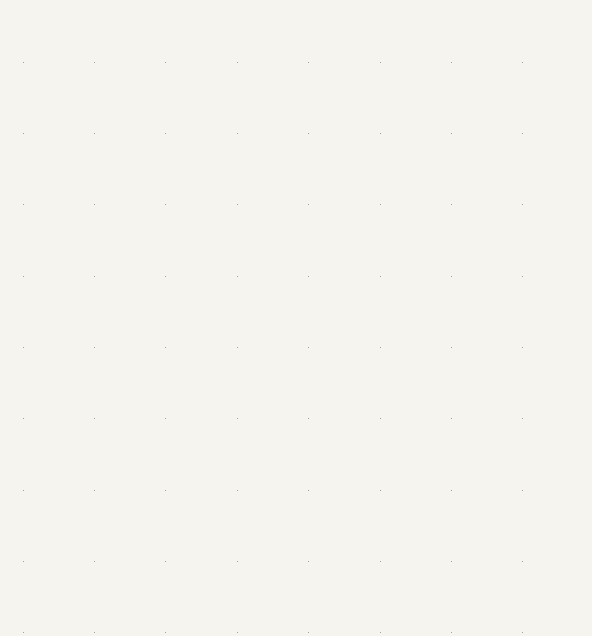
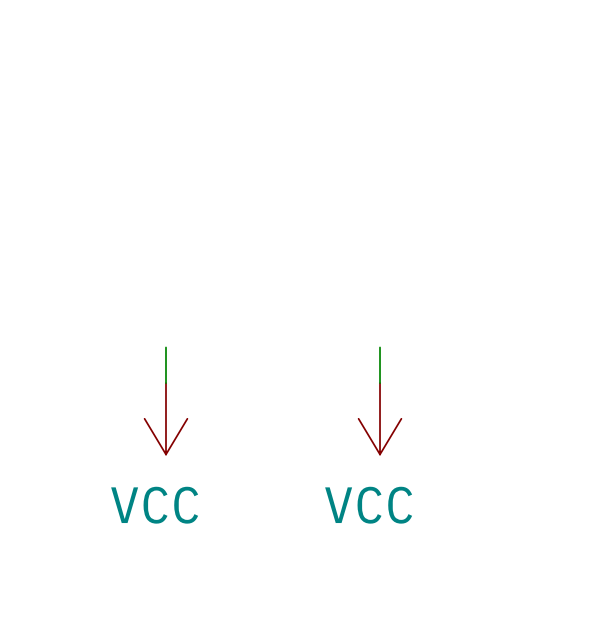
wire: none -> (165, 347) (165, 383)
wire: none -> (380, 347) (380, 383)
power symbol: none -> VCC (165, 418)
power symbol: none -> VCC (380, 418)

